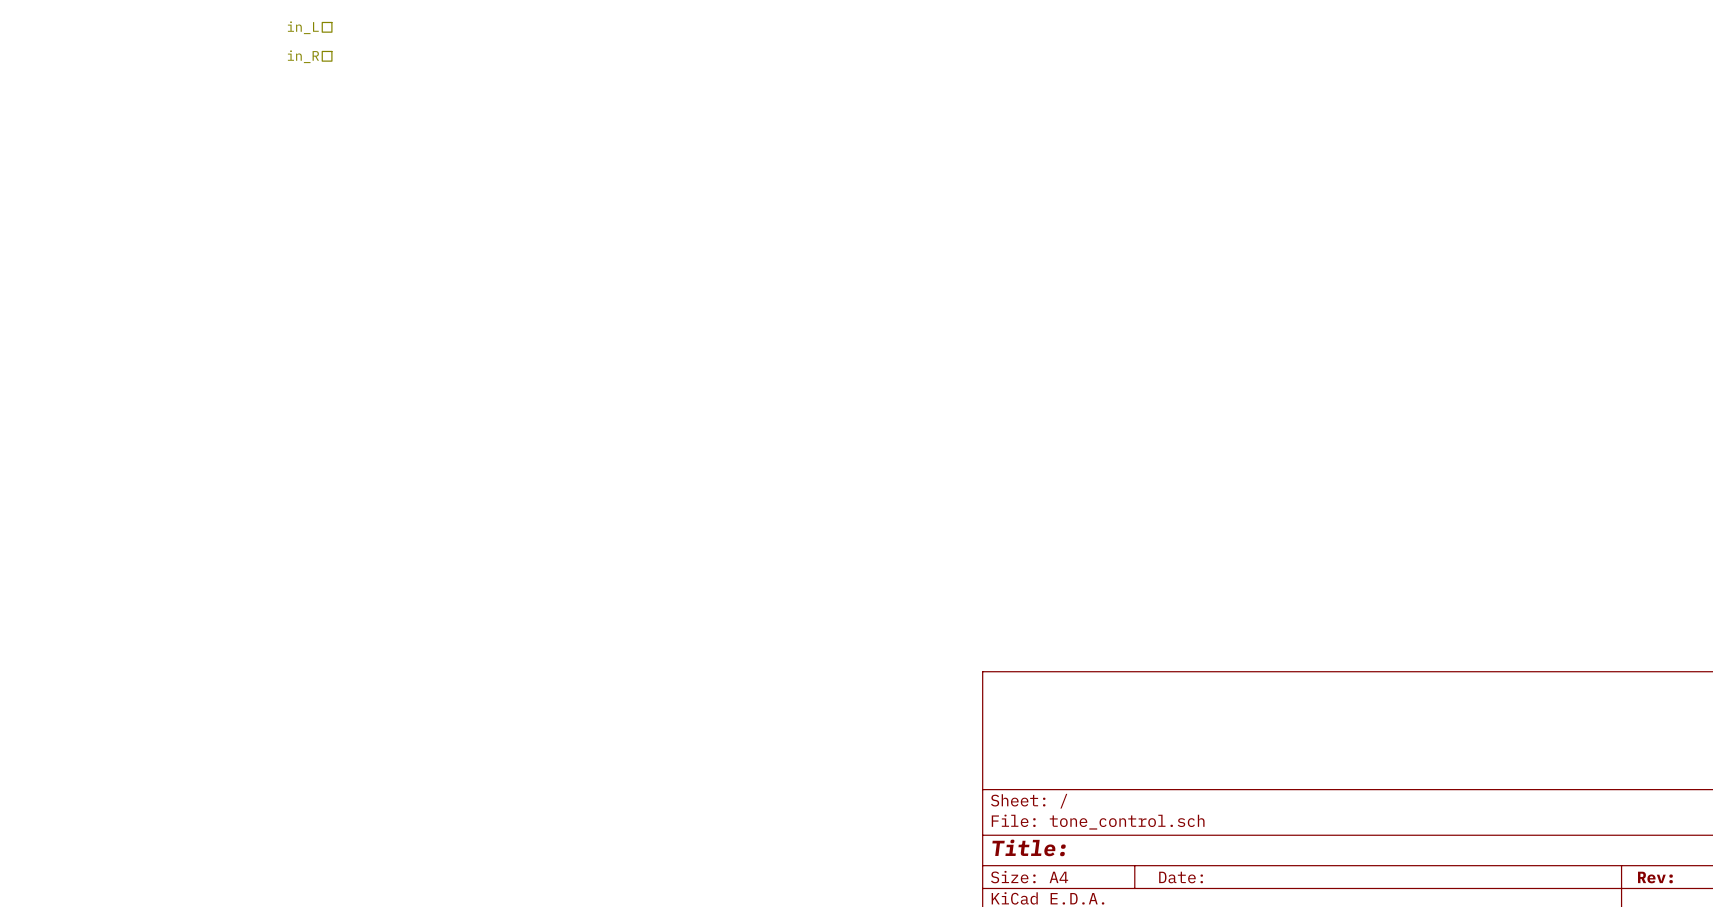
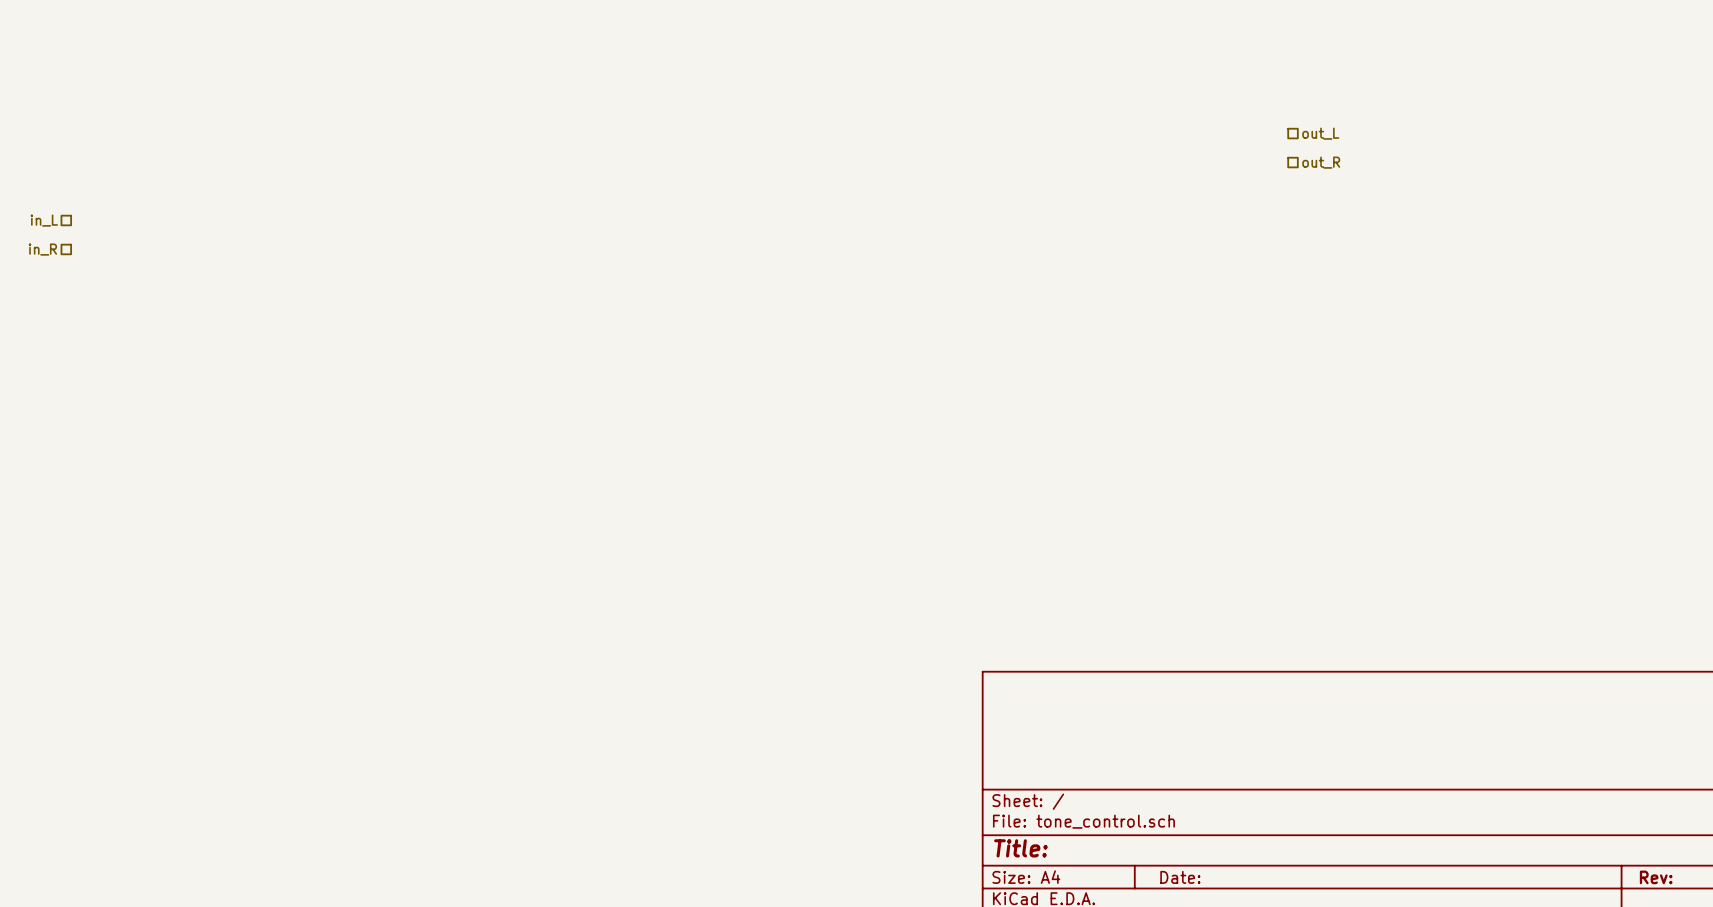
hierarchical label: in_L (303, 27) -> none
hierarchical label: in_R (303, 56) -> none
hierarchical label: none -> out_L (1320, 133)
hierarchical label: none -> out_R (1321, 162)
hierarchical label: none -> in_L (44, 220)
hierarchical label: none -> in_R (42, 249)

